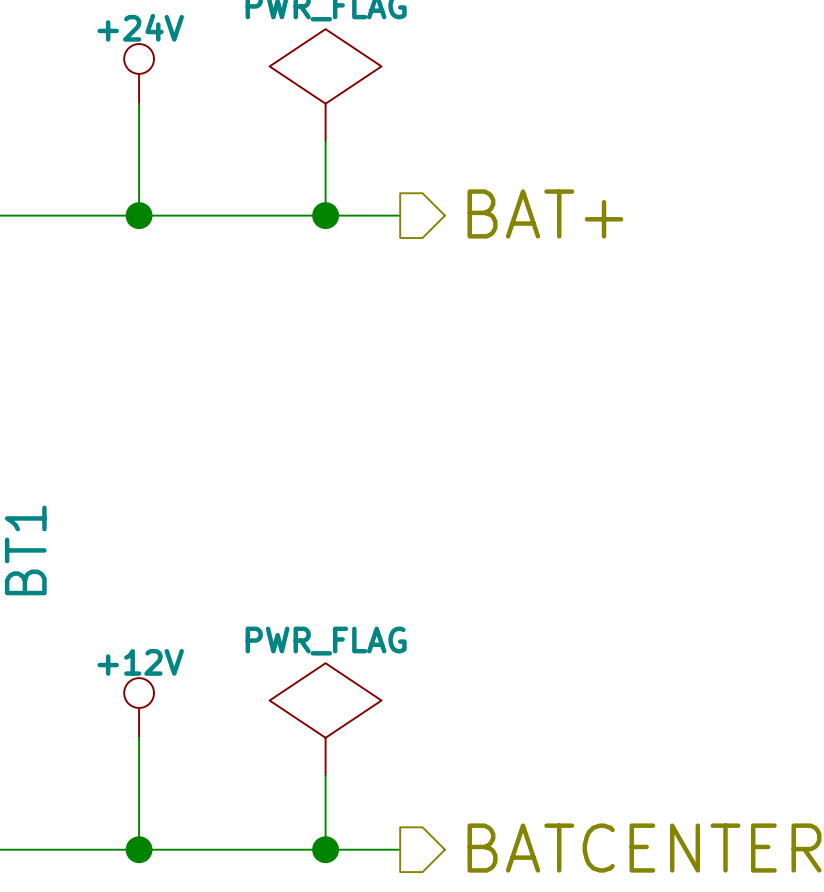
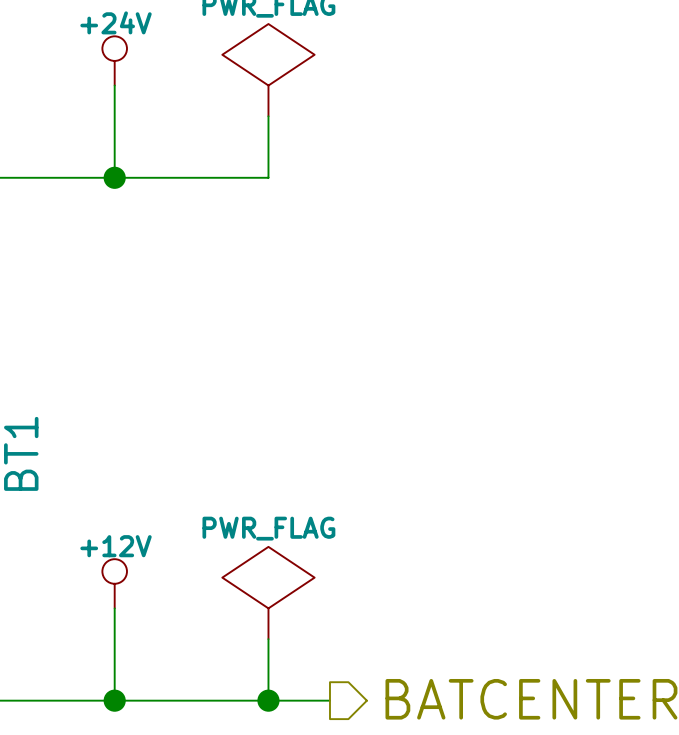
hierarchical label: BAT+ (545, 213) -> none
wire: (325, 215) (400, 215) -> none
junction: (325, 215) -> none

